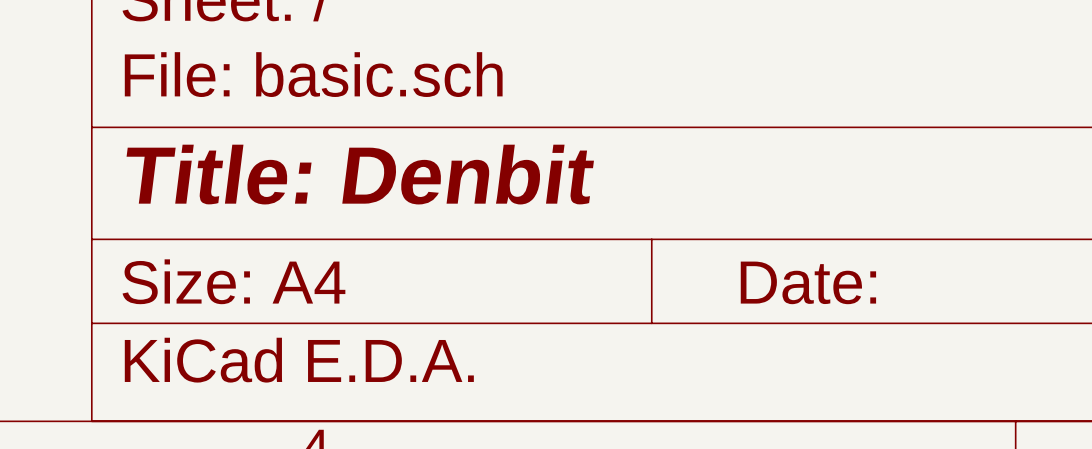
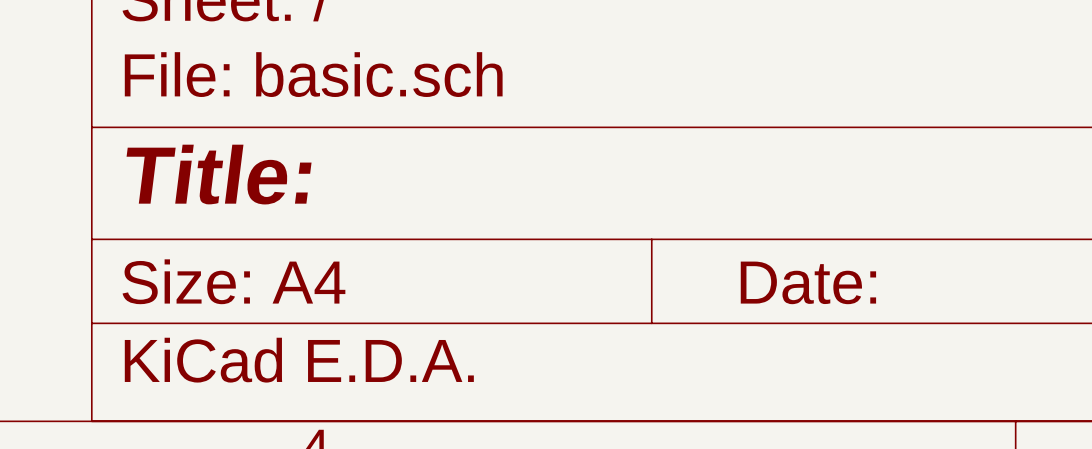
title block: Title: Denbit (360, 174) -> Title: (219, 174)

